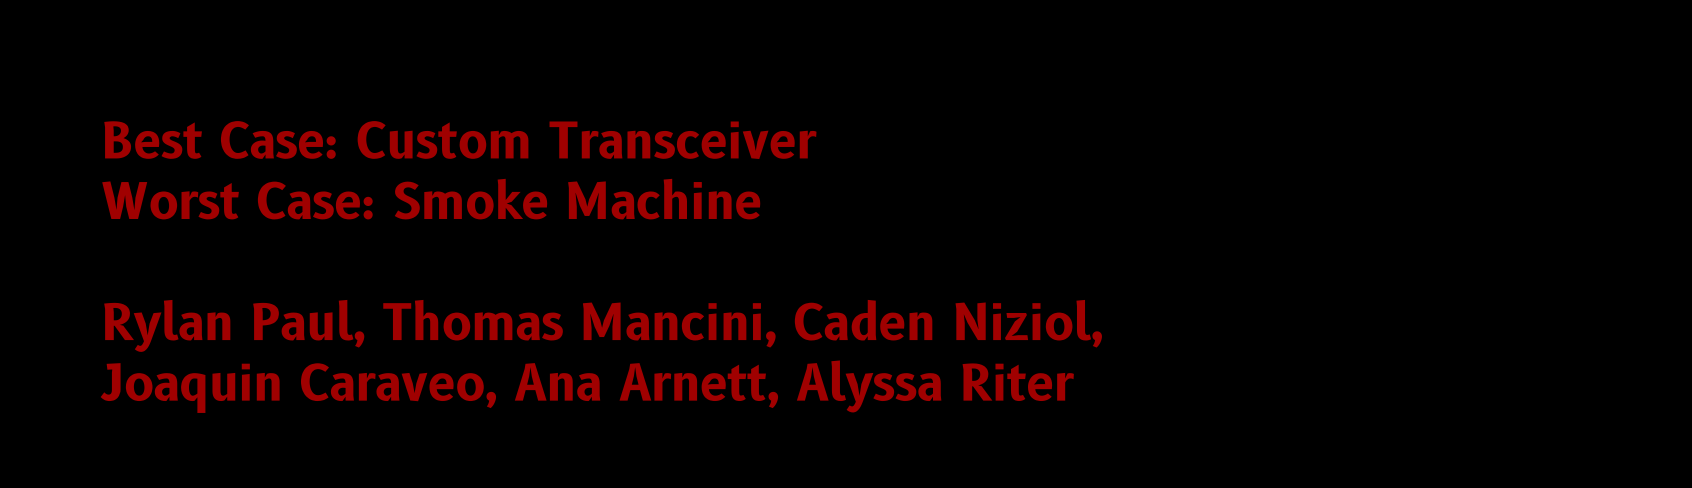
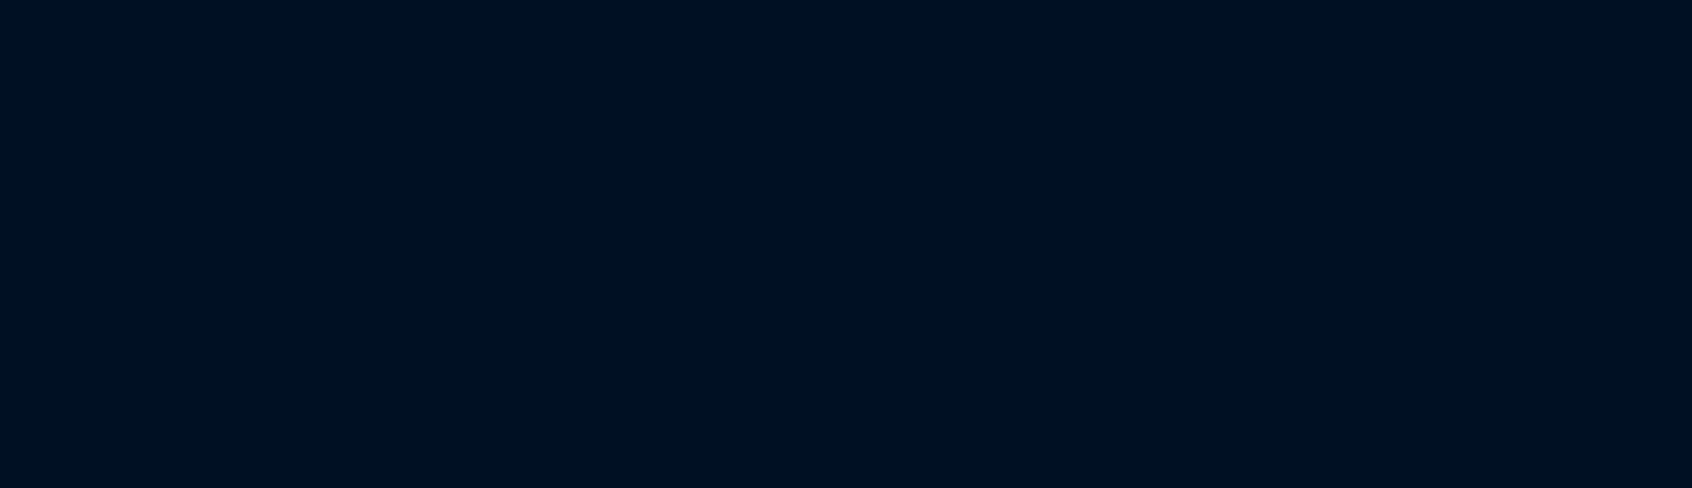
text: Best Case: Custom Transceiver (460, 140) -> none
text: Worst Case: Smoke Machine (431, 199) -> none
text: Rylan Paul, Thomas Mancini, Caden Niziol, (603, 325) -> none
text: Joaquin Caraveo, Ana Arnett, Alyssa Riter (587, 386) -> none

